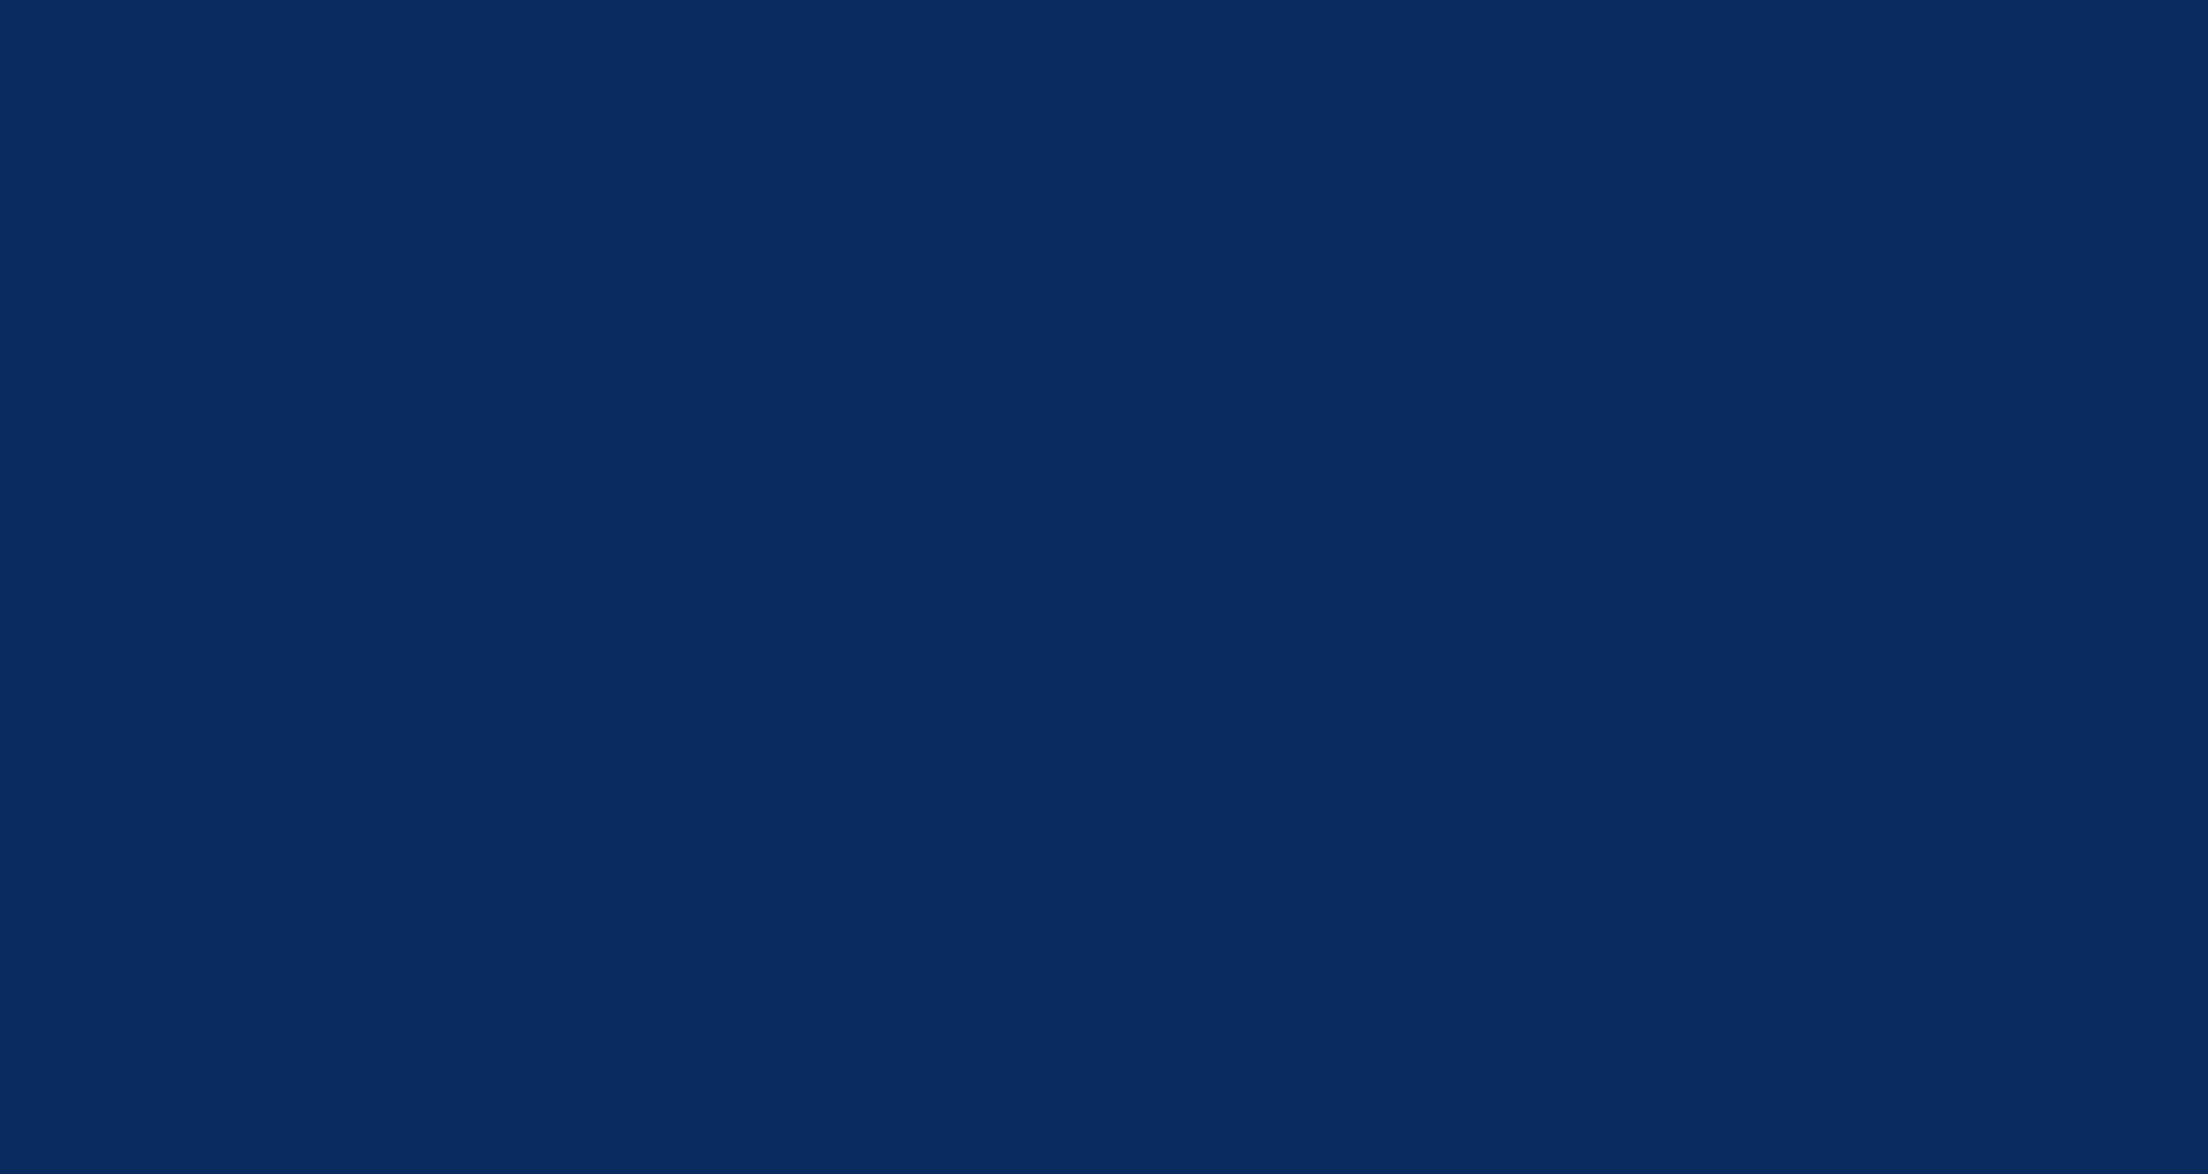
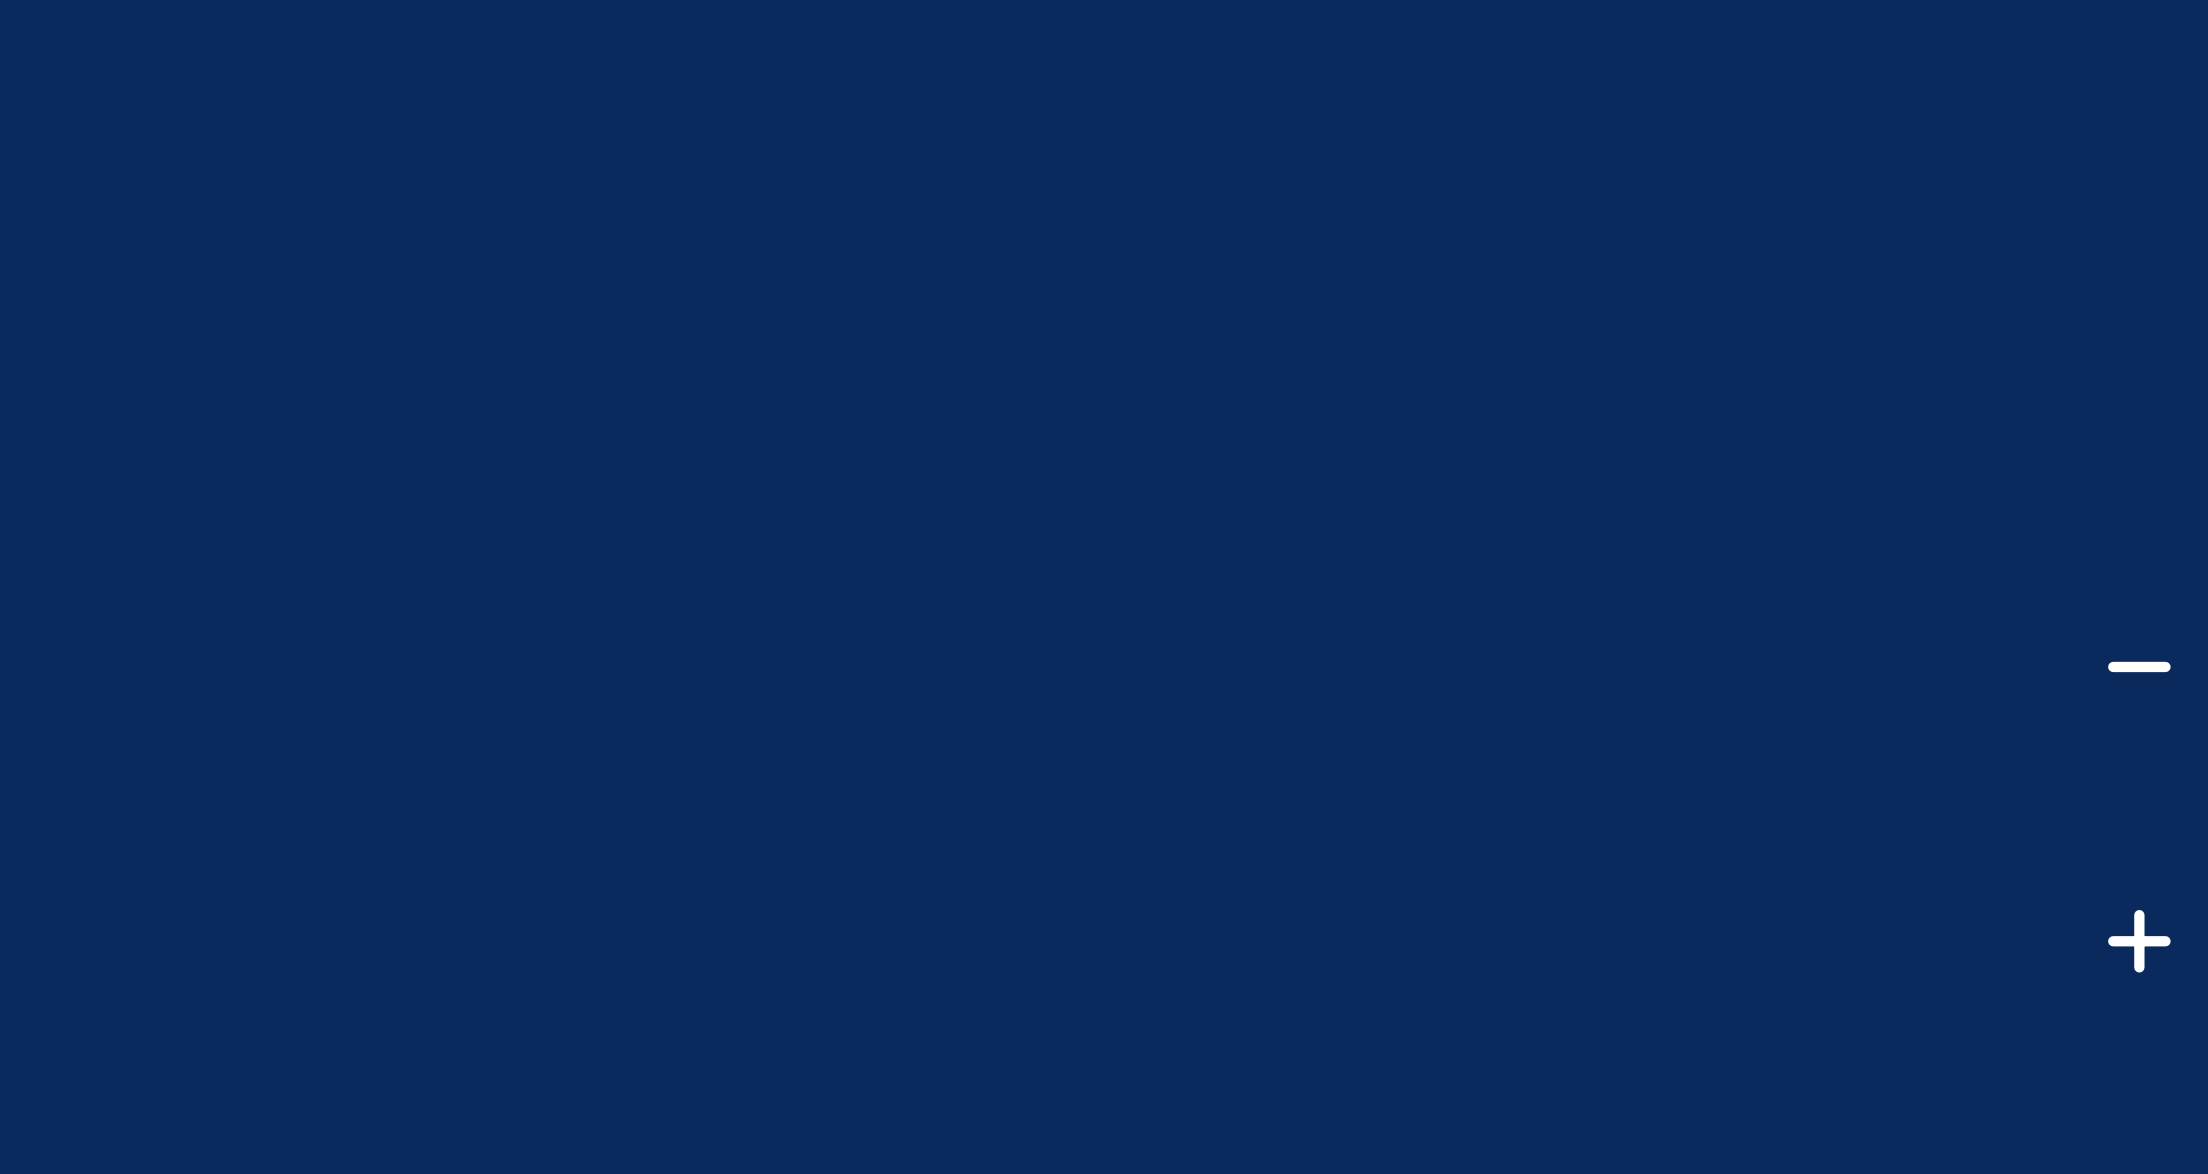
text: none -> - (2139, 666)
text: none -> + (2139, 941)

